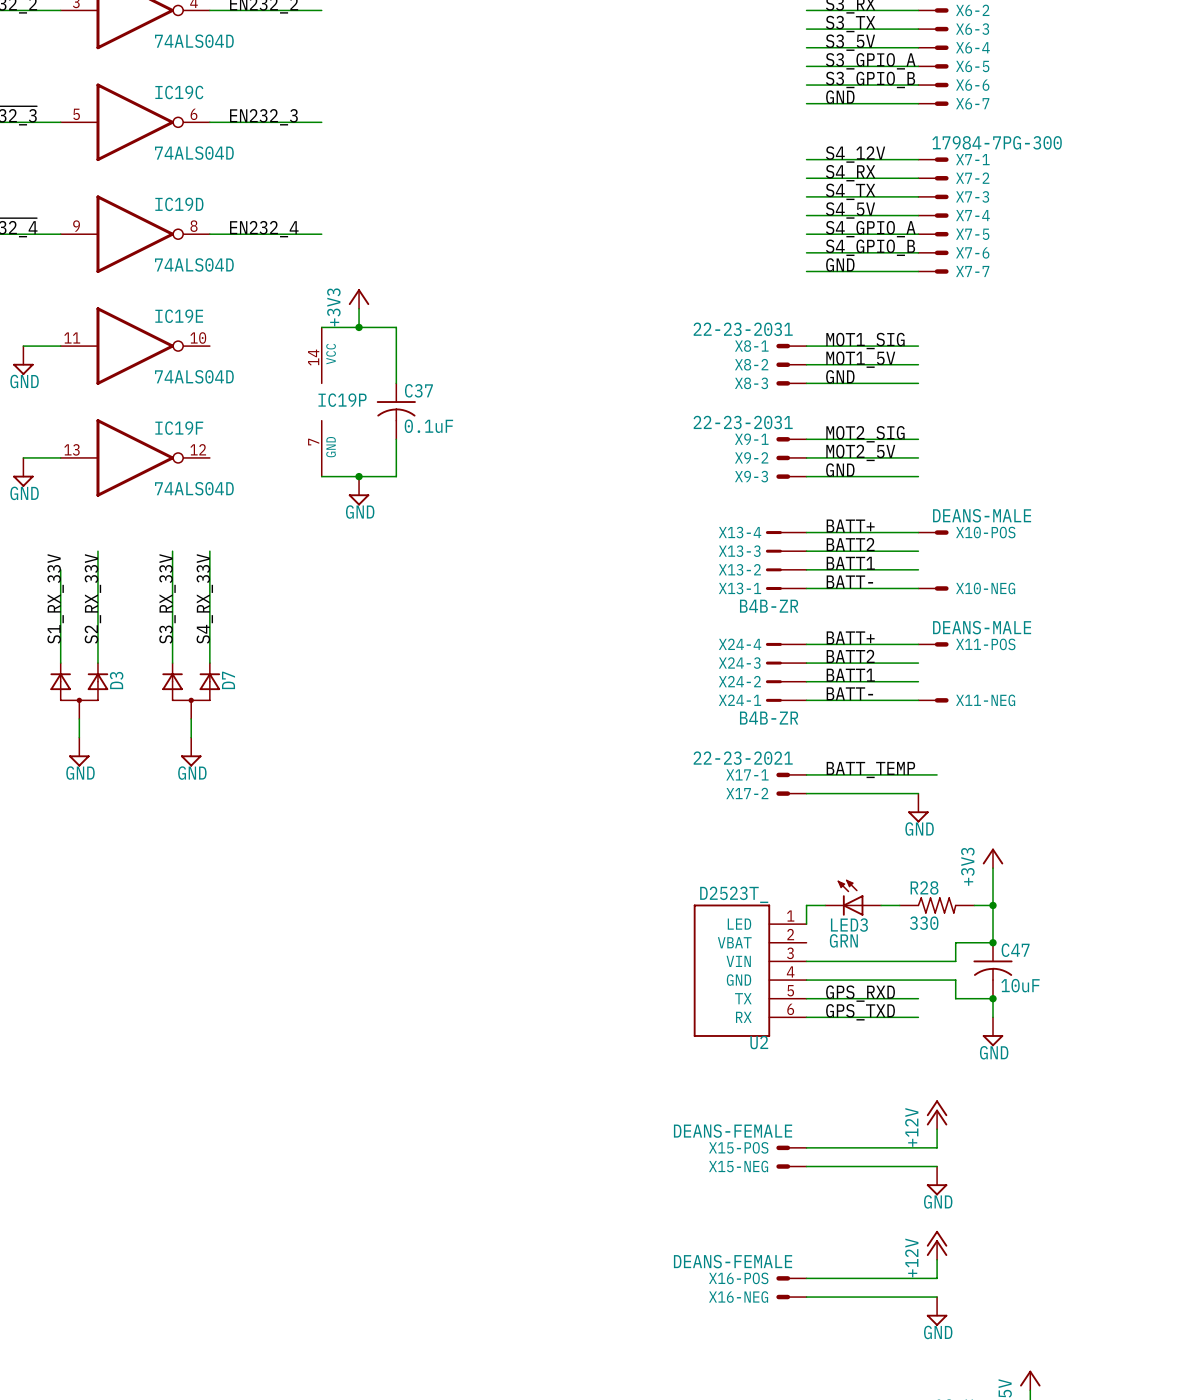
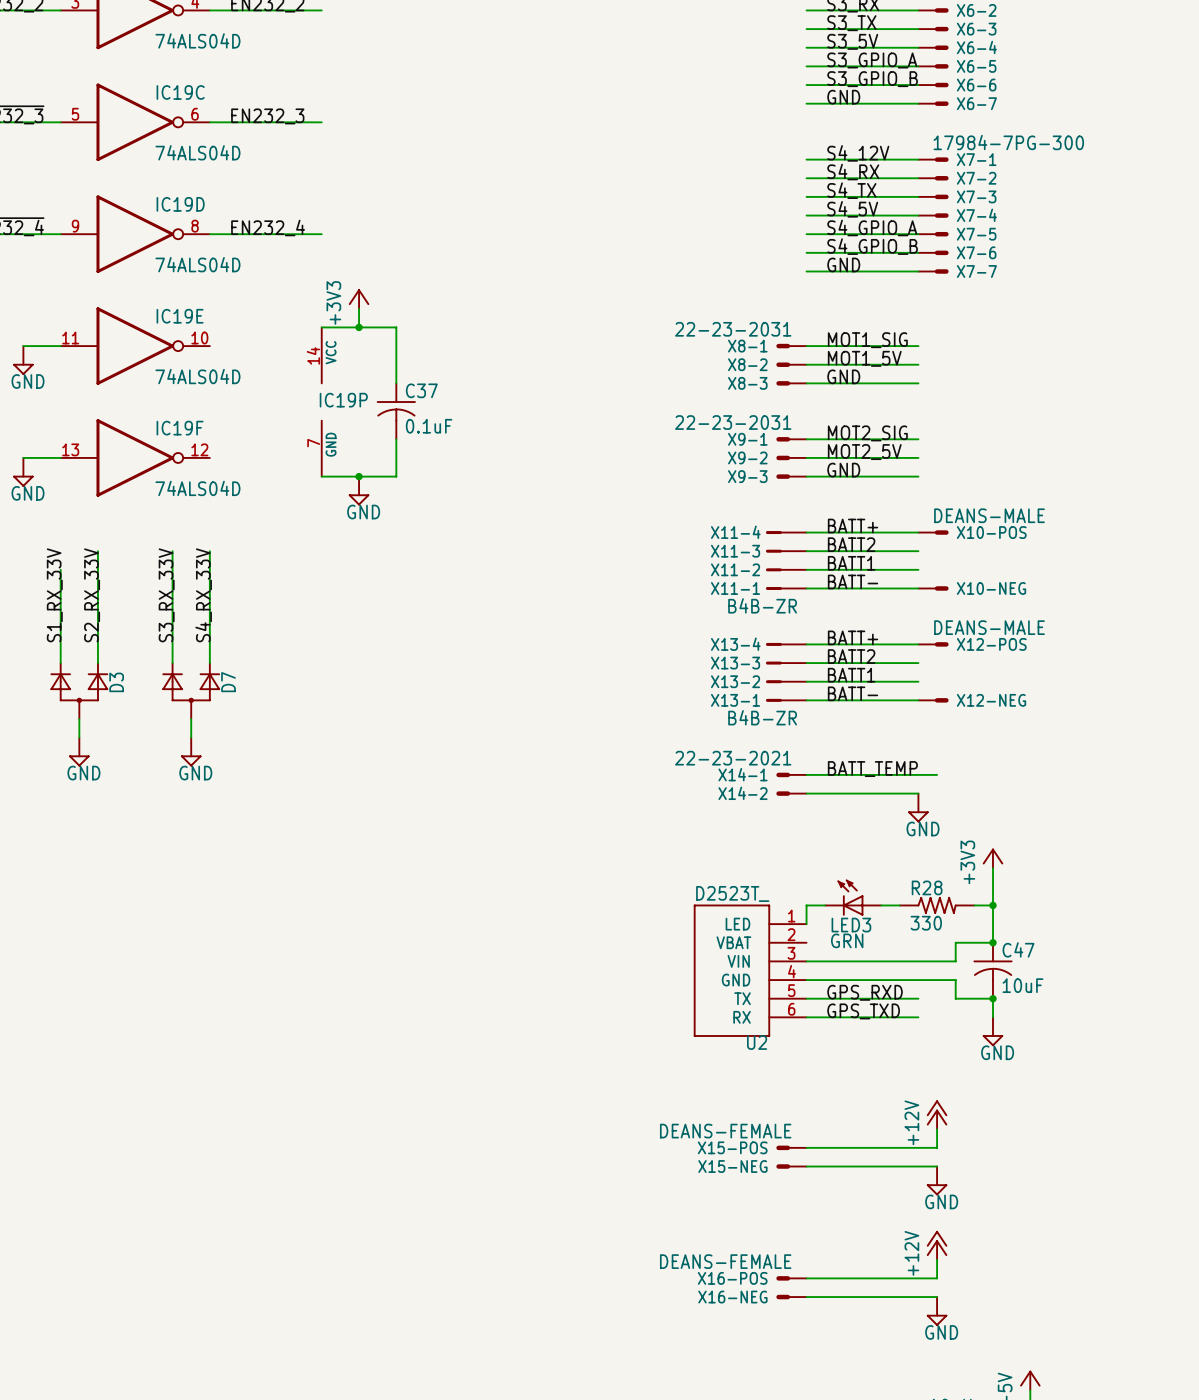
X13-4 name: X13-4 (740, 532) -> X11-4 (735, 532)
X13-3 name: X13-3 (739, 551) -> X11-3 (735, 551)
X13-2 name: X13-2 (739, 569) -> X11-2 (735, 569)
X13-1 name: X13-1 (739, 588) -> X11-1 (735, 588)
X24-4 name: X24-4 (740, 644) -> X13-4 (735, 644)
X11-POS name: X11-POS (985, 644) -> X12-POS (991, 644)
X24-3 name: X24-3 (739, 663) -> X13-3 (735, 663)
X24-2 name: X24-2 (739, 681) -> X13-2 (735, 681)
X24-1 name: X24-1 (739, 700) -> X13-1 (735, 700)
X11-NEG name: X11-NEG (985, 700) -> X12-NEG (991, 700)
X17-1 name: X17-1 (747, 774) -> X14-1 (743, 774)
X17-2 name: X17-2 (747, 793) -> X14-2 (743, 793)

